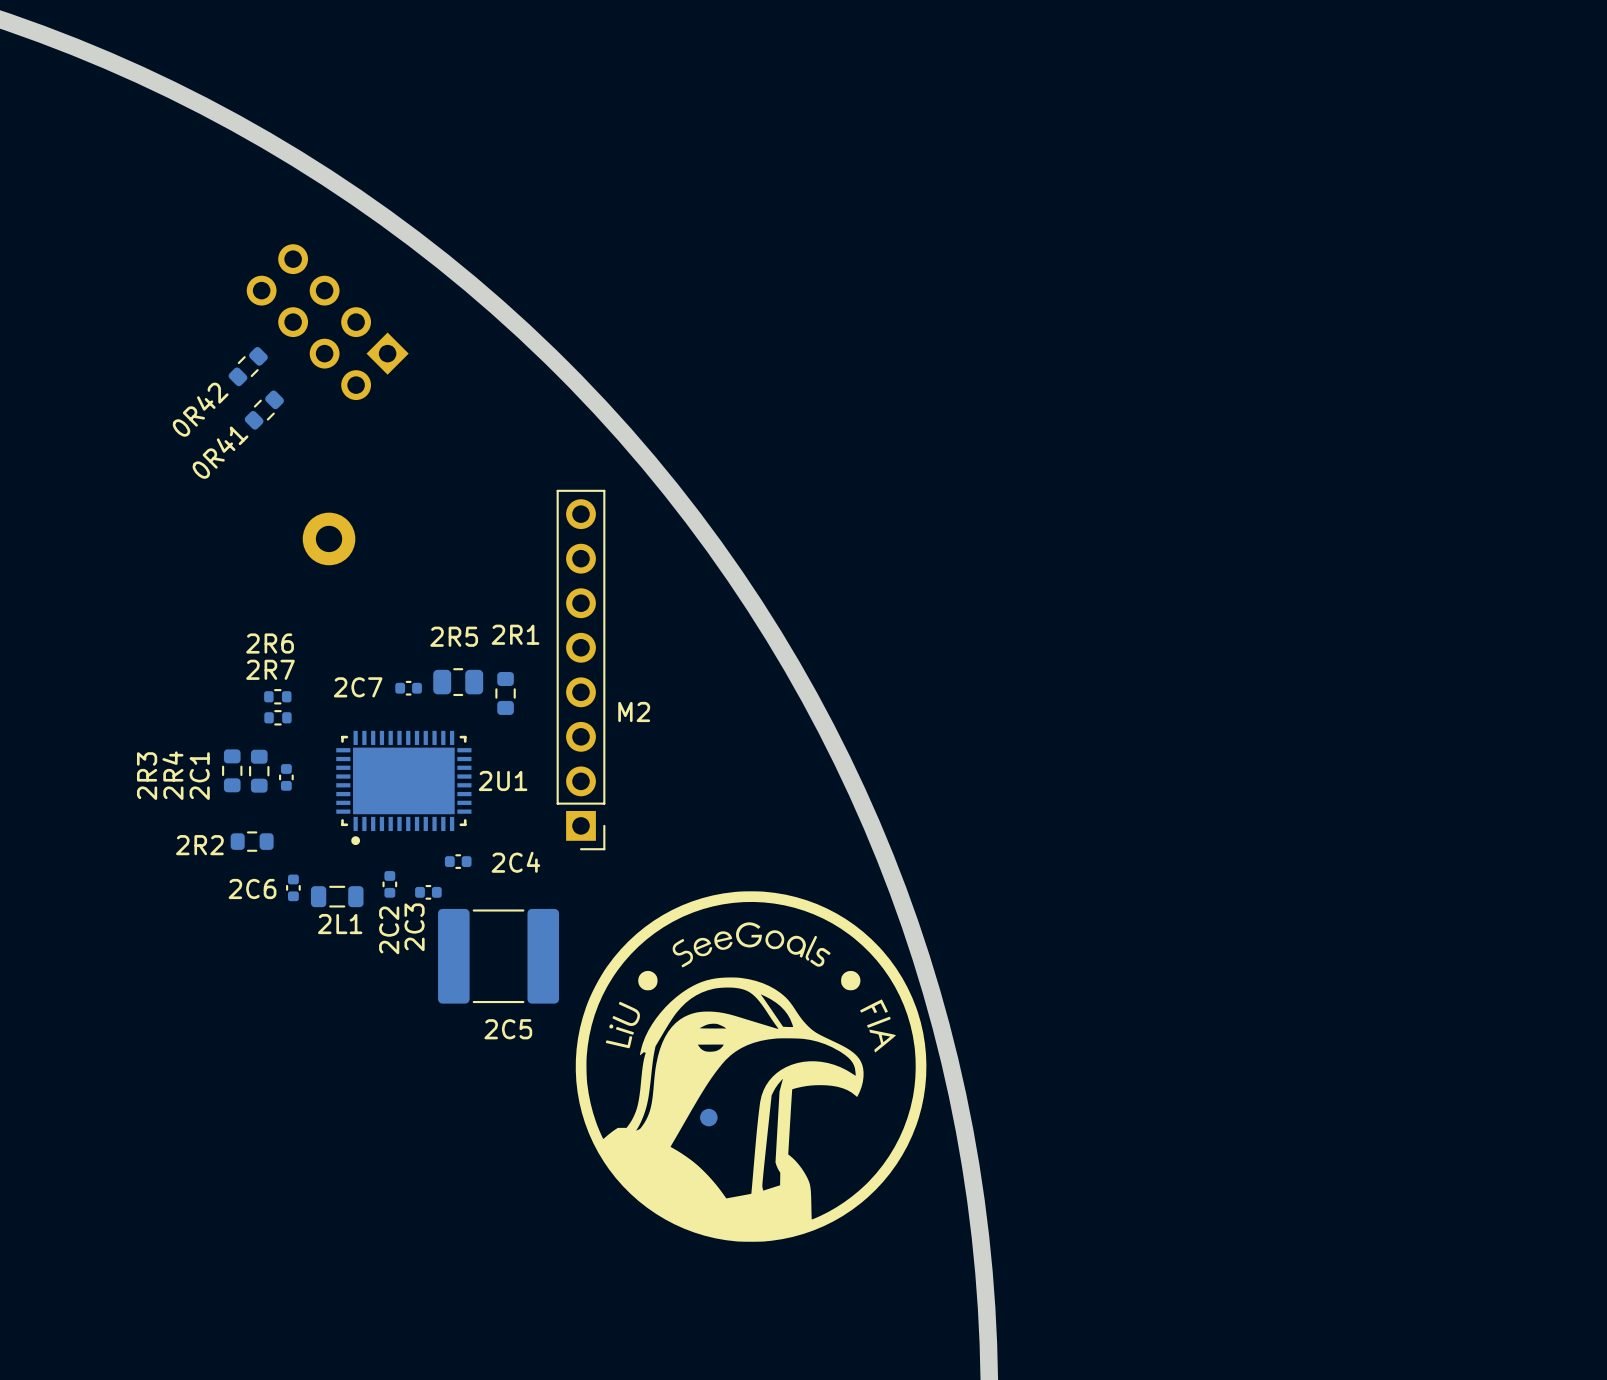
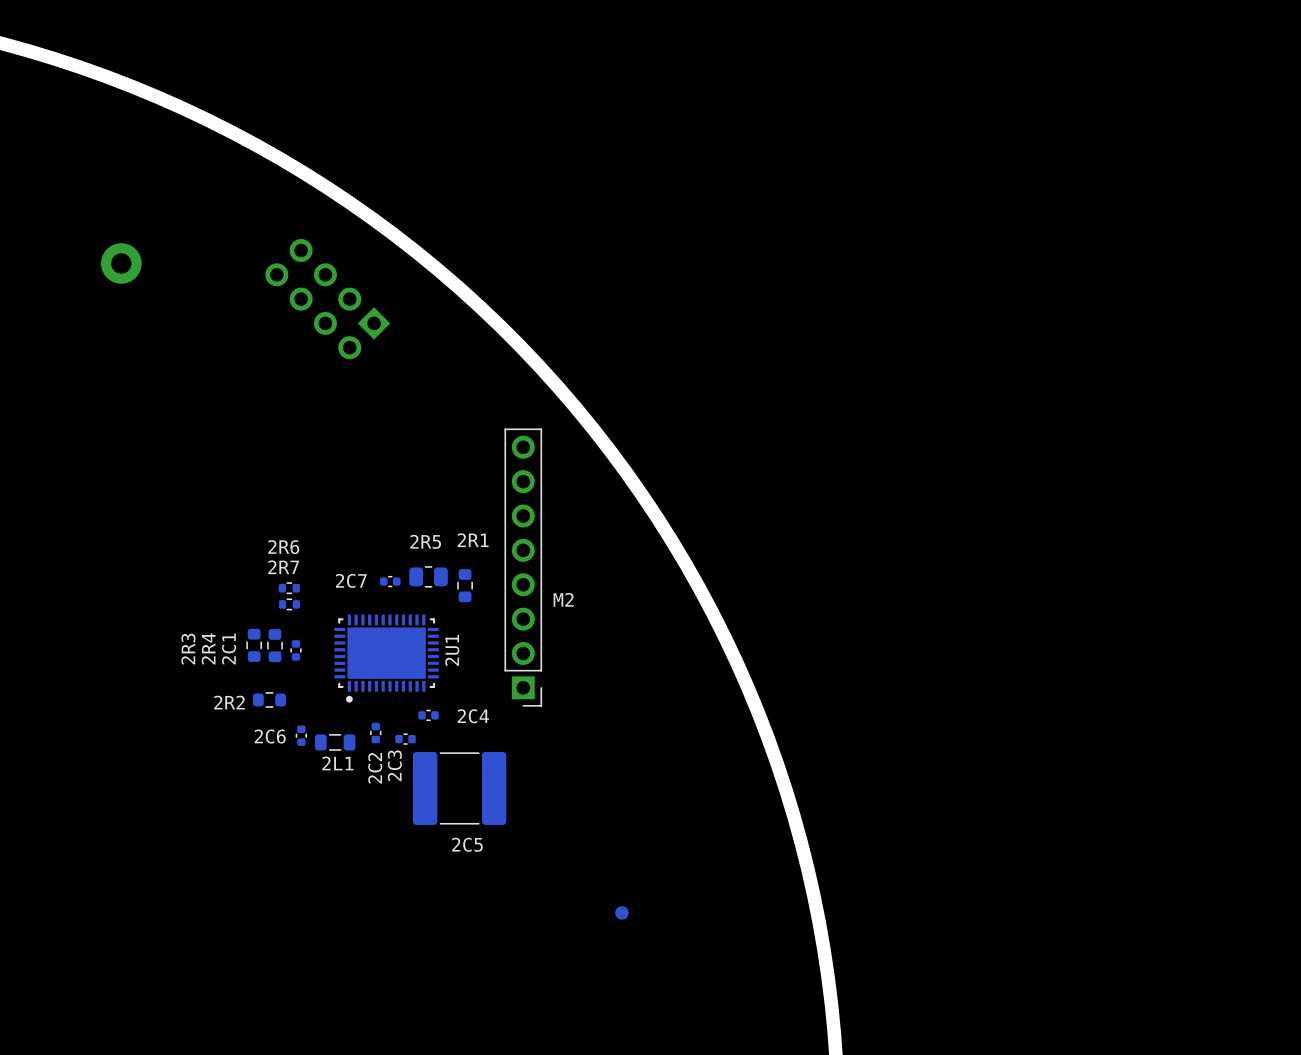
0R42: (248, 366) -> none
0R41: (264, 410) -> none
part position: (329, 538) -> (121, 263)
2U1 name rotation: 0° (503, 780) -> 90° counterclockwise (452, 650)
drawing: [575, 891, 927, 1242] -> none

